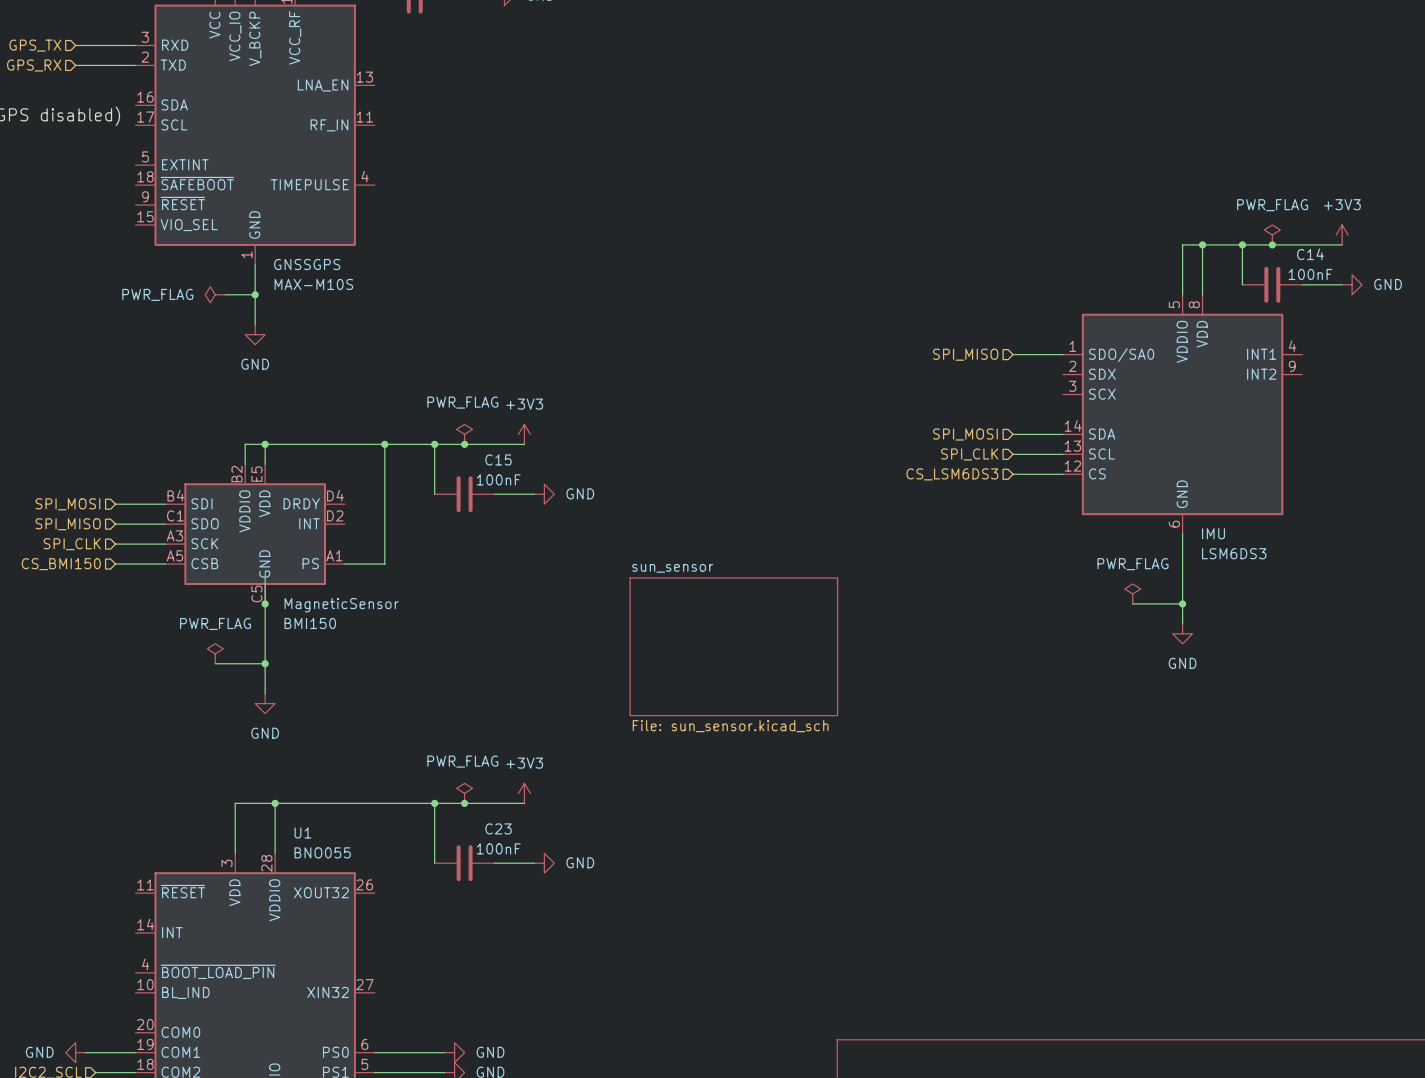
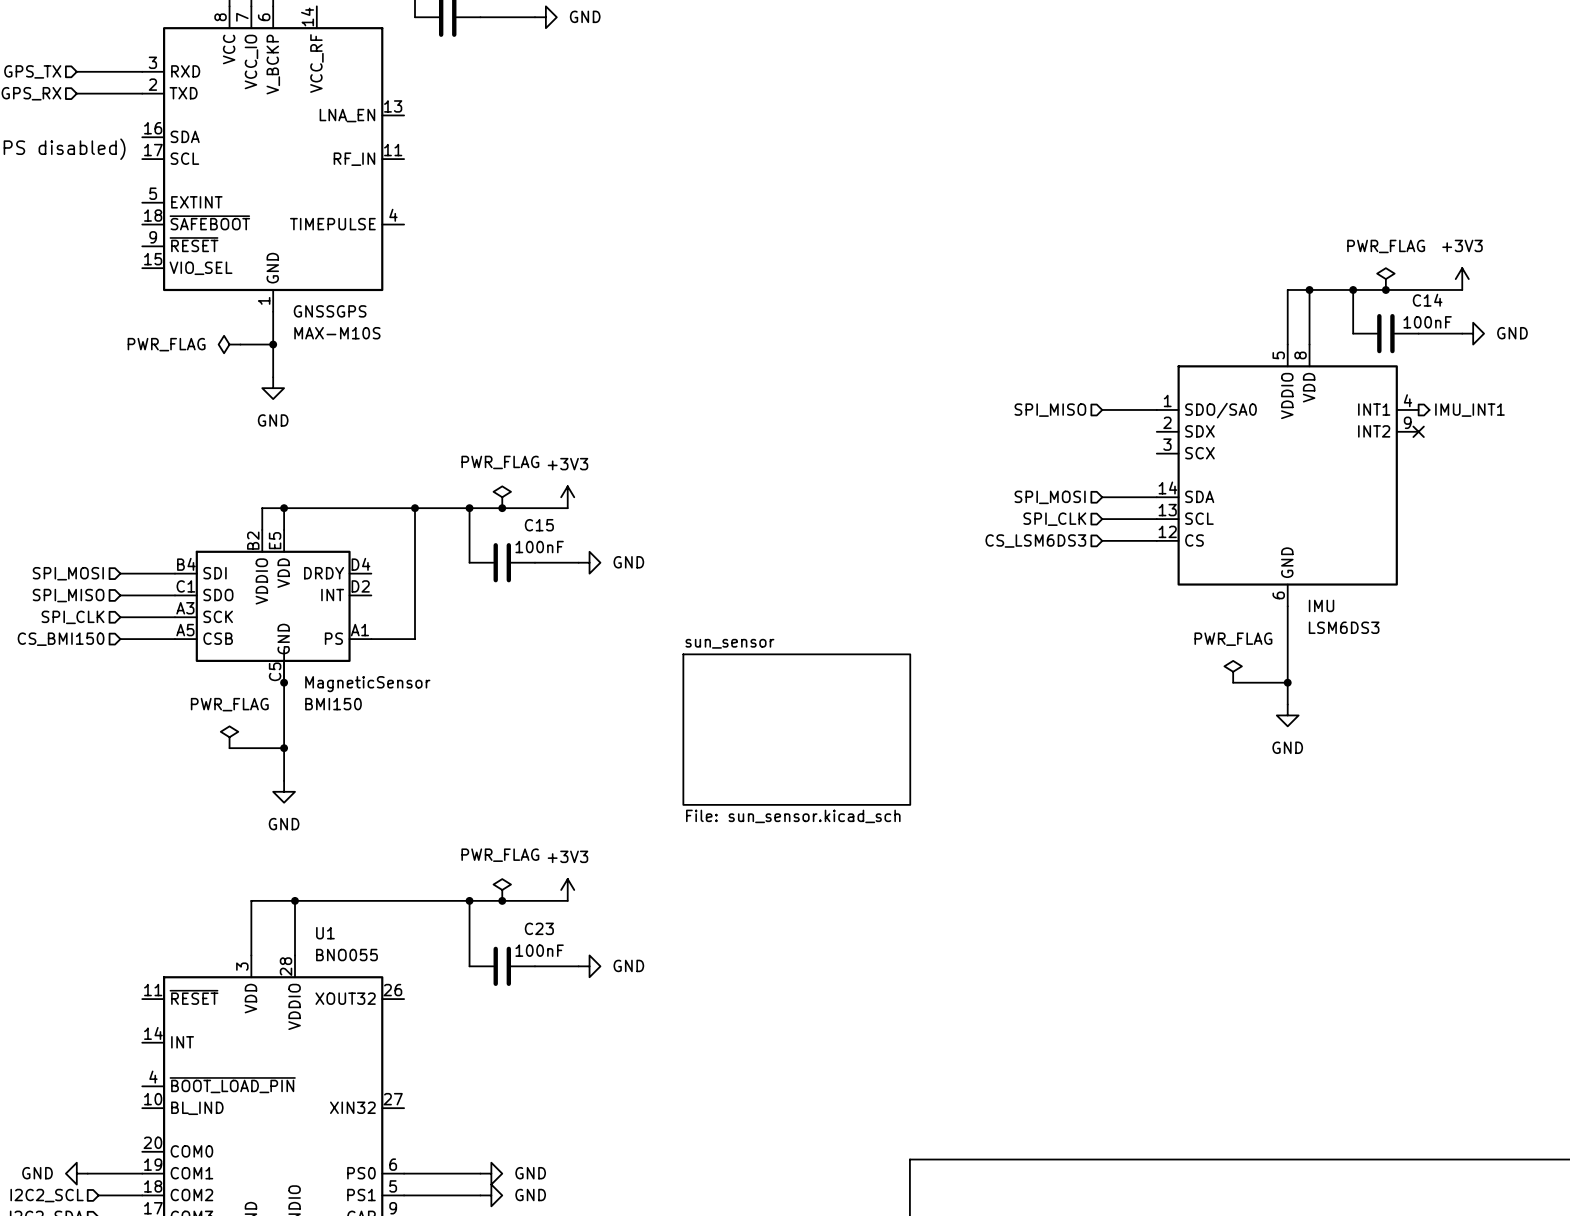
hierarchical label: none -> IMU_INT1 (1469, 410)
no-connect mark: none -> (1418, 431)

